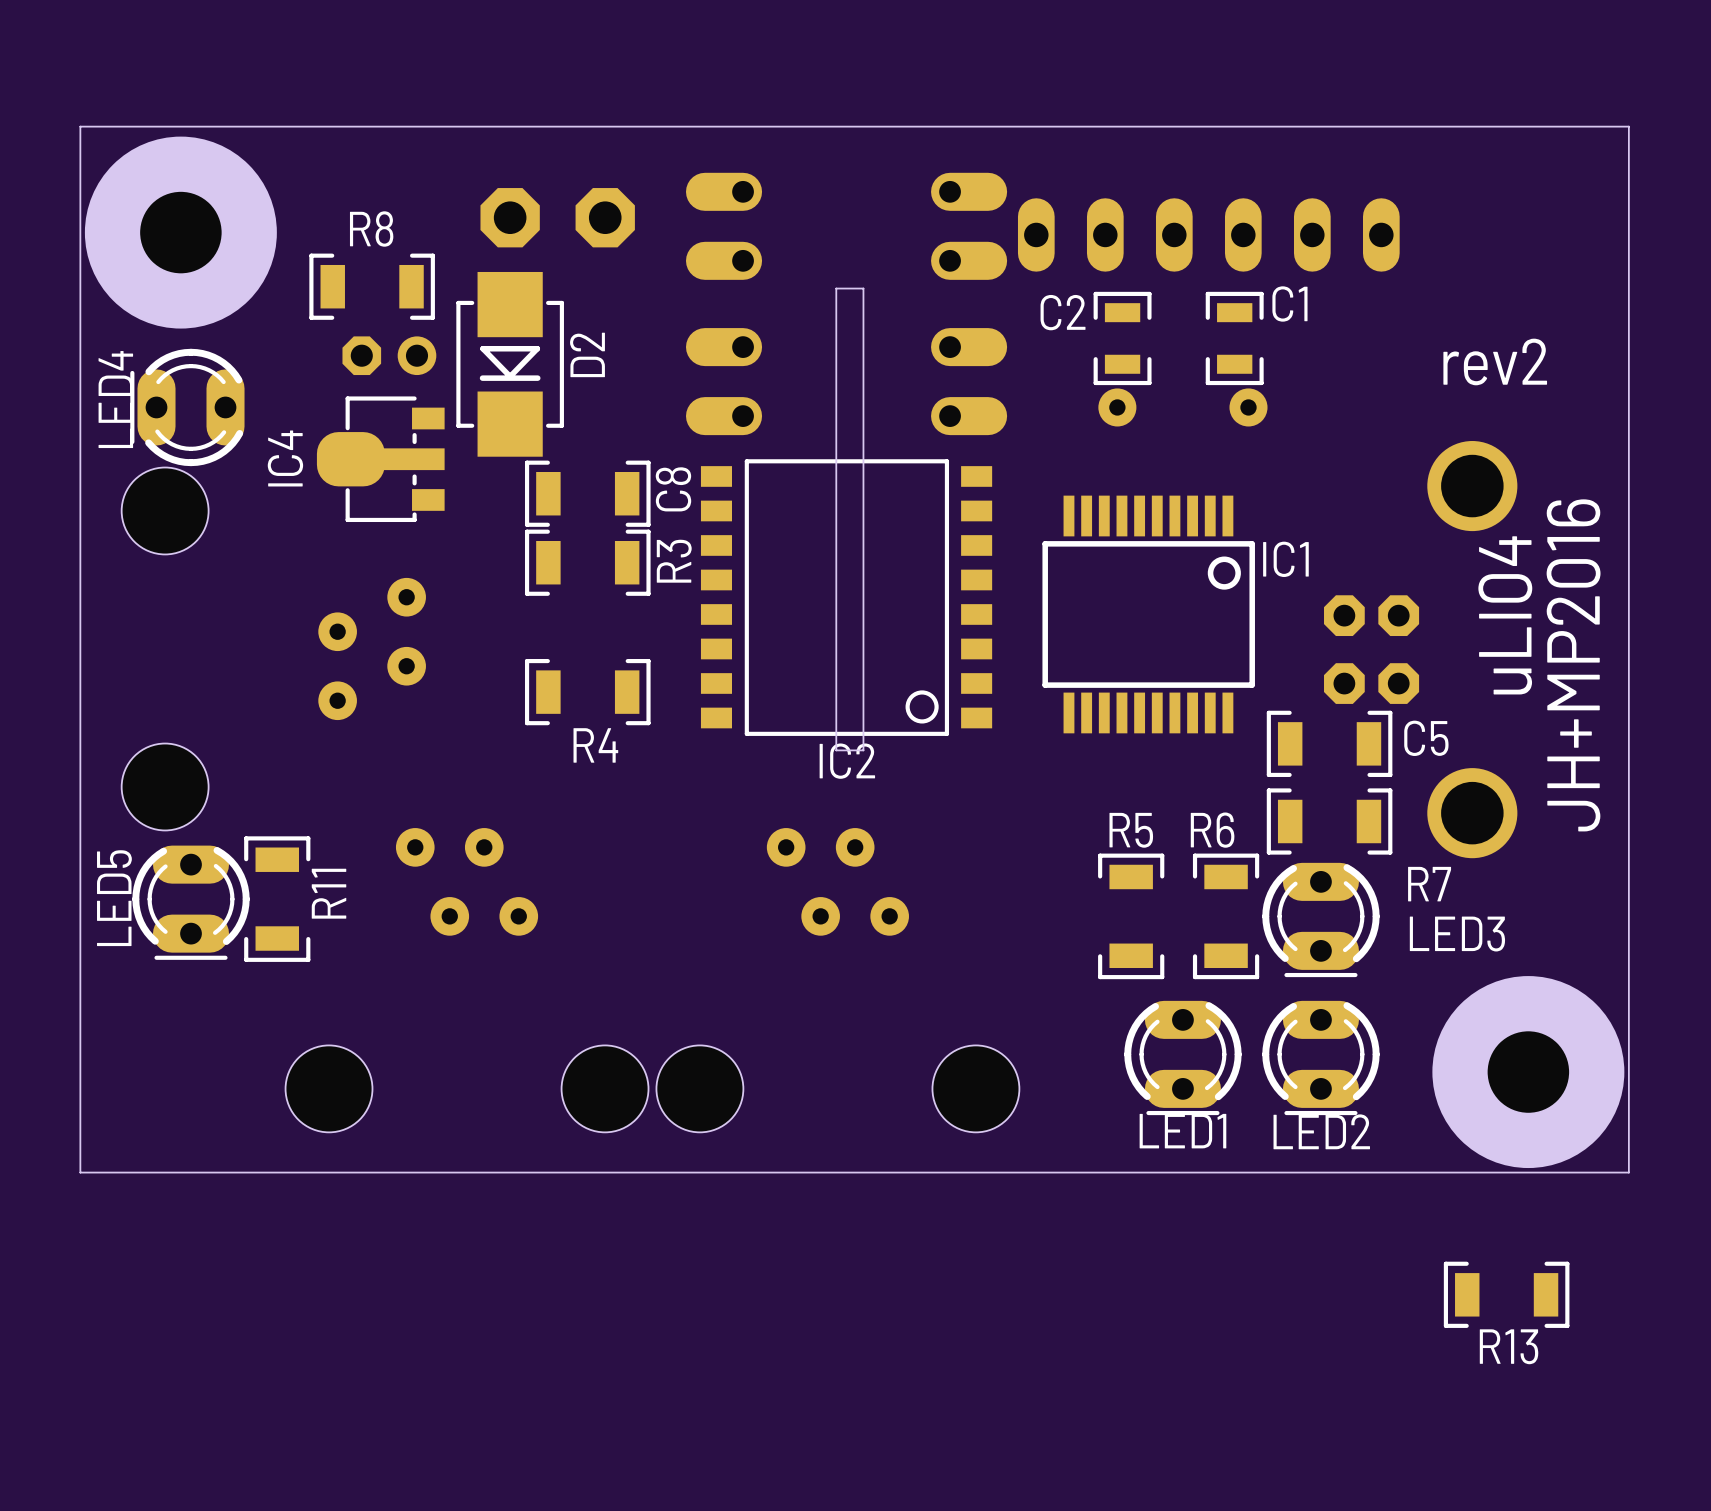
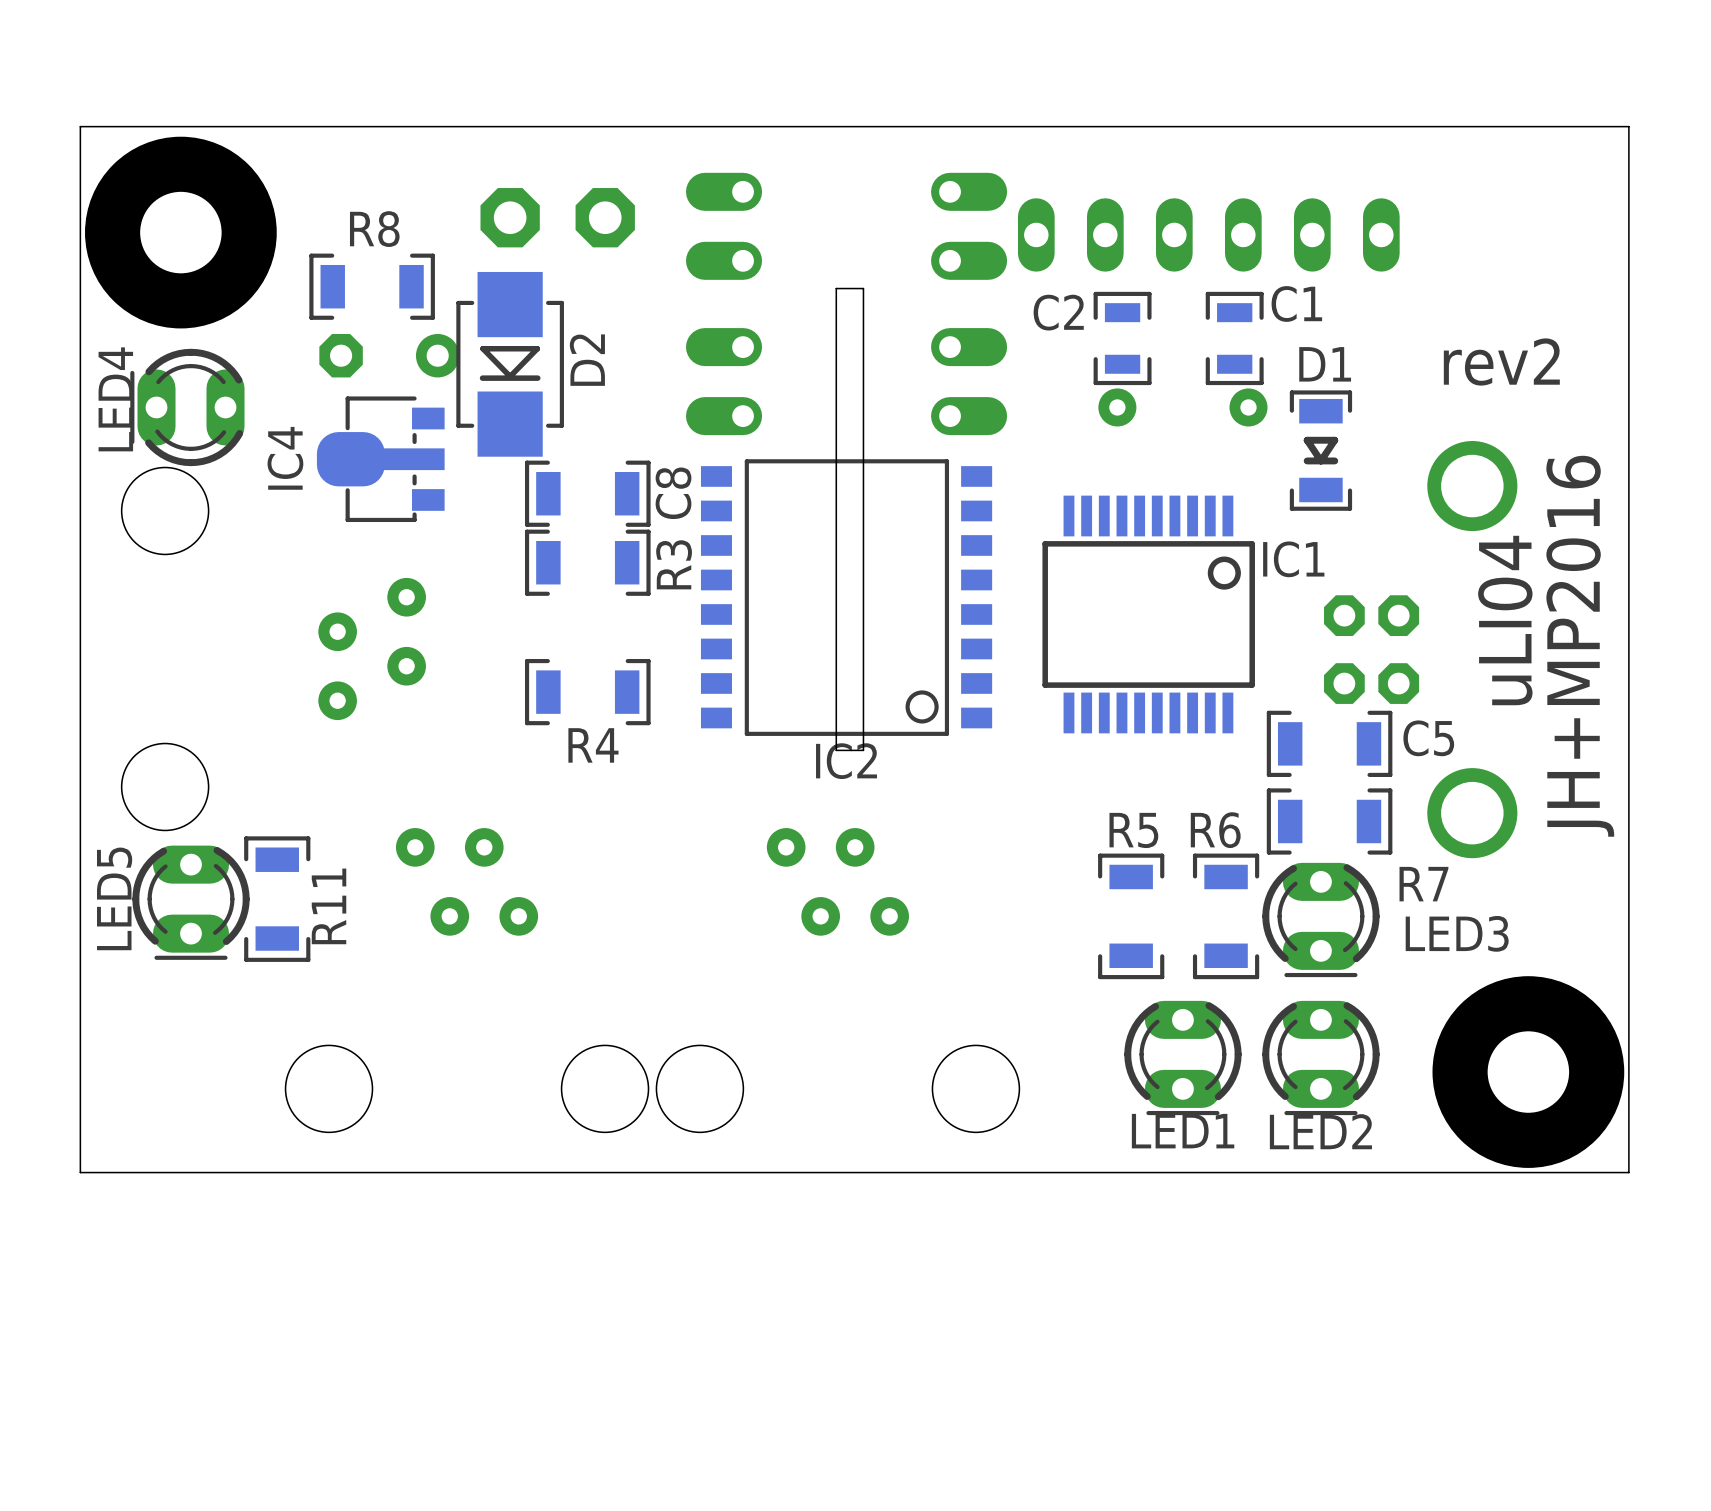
part footprint: [342, 336, 437, 376] -> [319, 333, 460, 378]
D1: none -> (1320, 450)
R13: (1506, 1294) -> none

